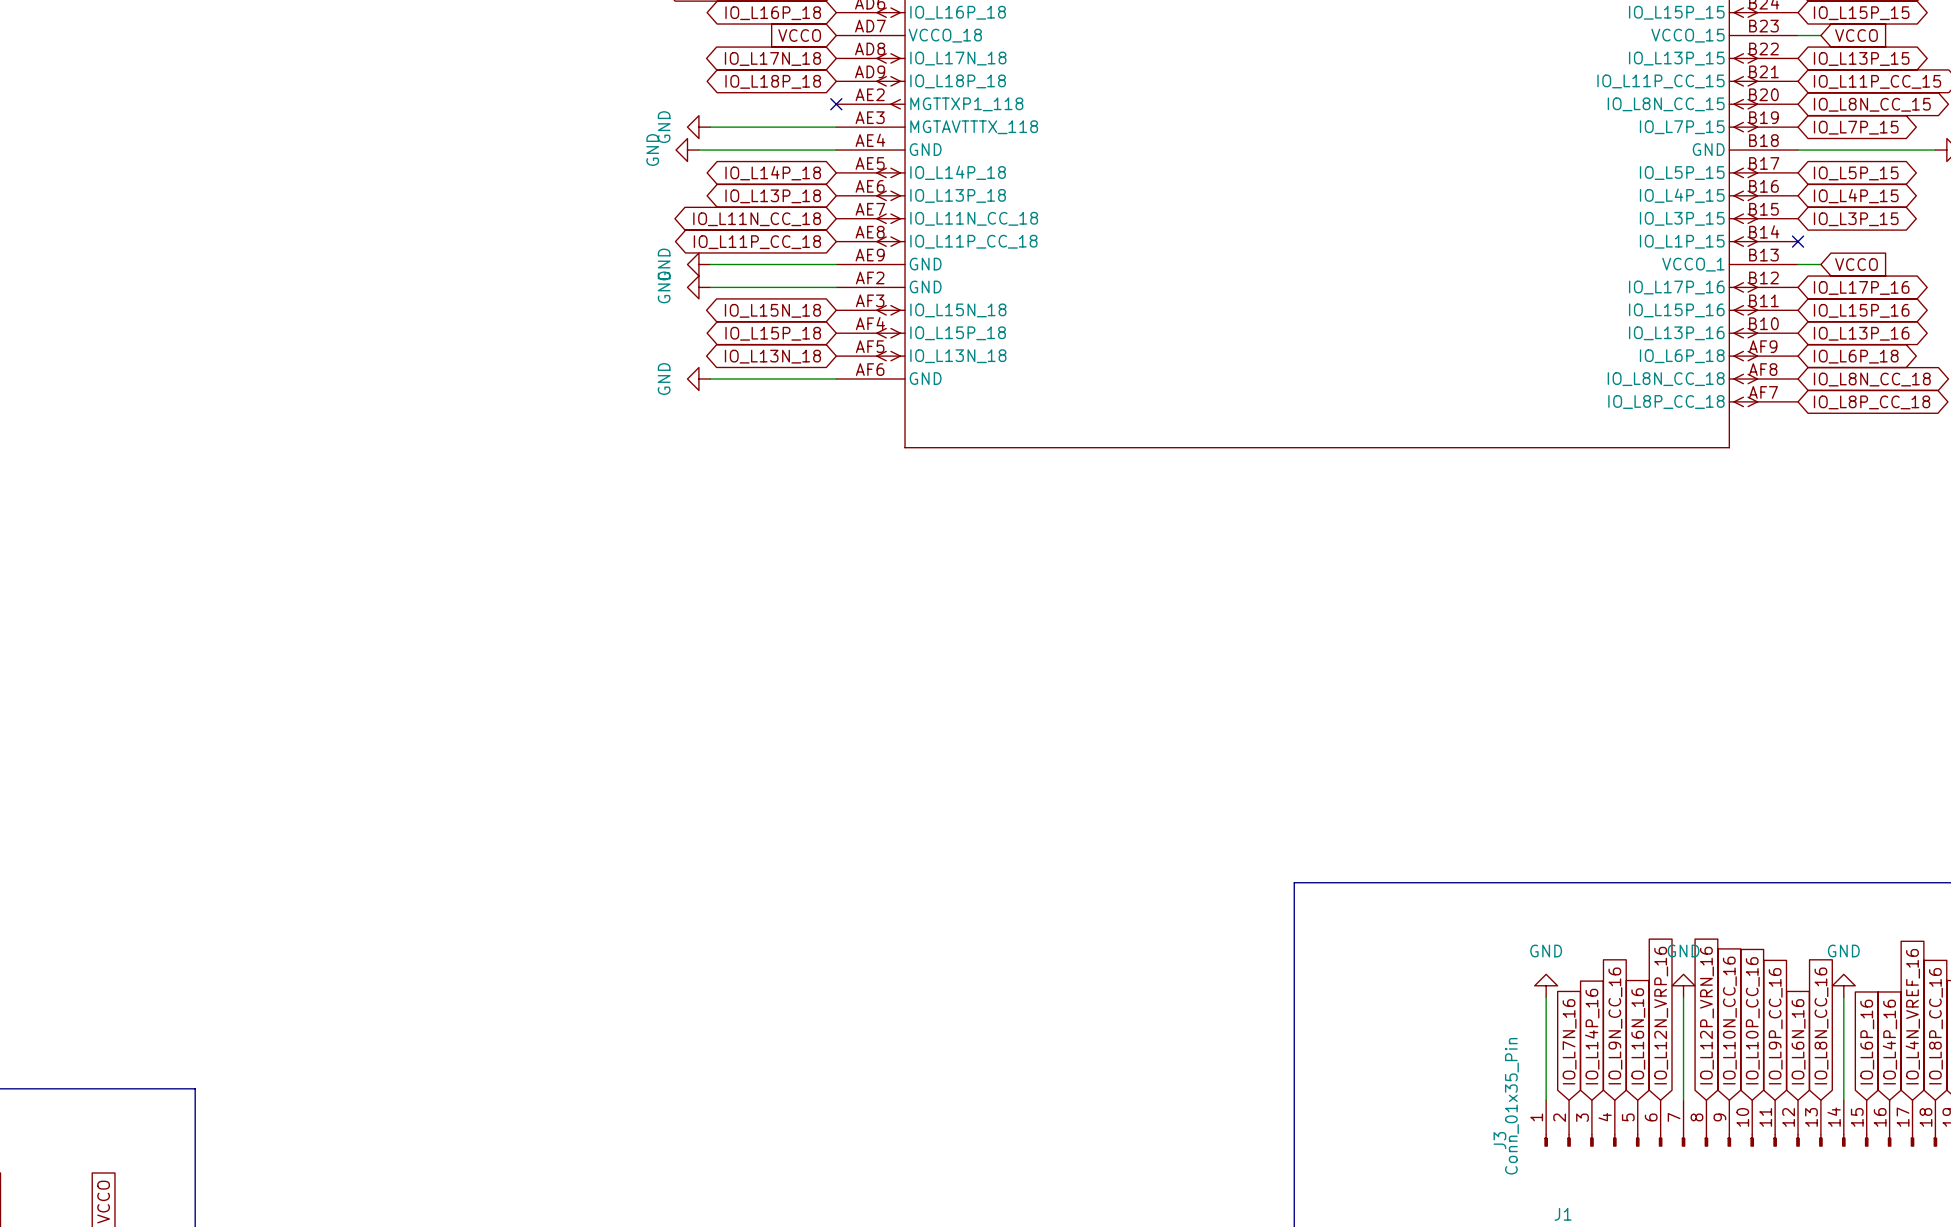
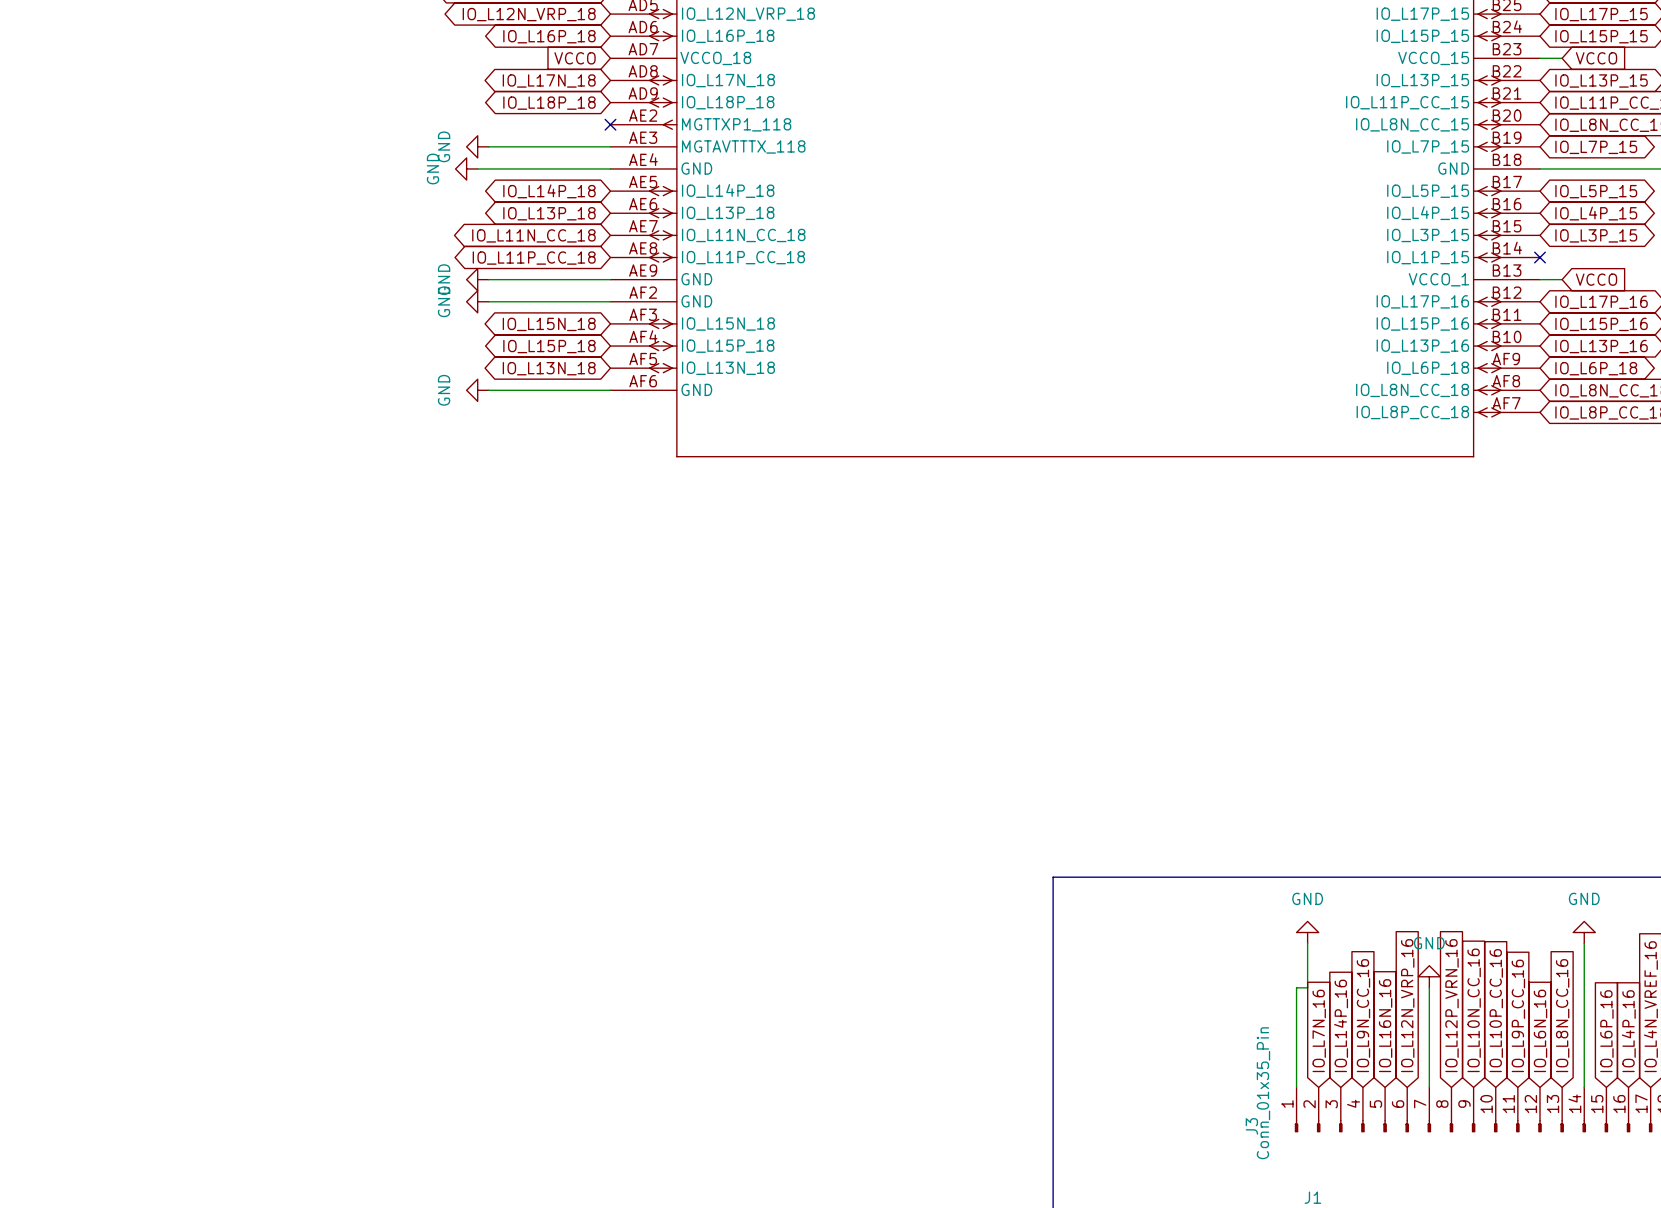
wire: none -> (1307, 943) (1307, 987) (1296, 987)
wire: none -> (1584, 943) (1584, 987)
power symbol position: GND (1546, 985) -> GND (1307, 932)
power symbol position: GND (1843, 985) -> GND (1584, 932)

